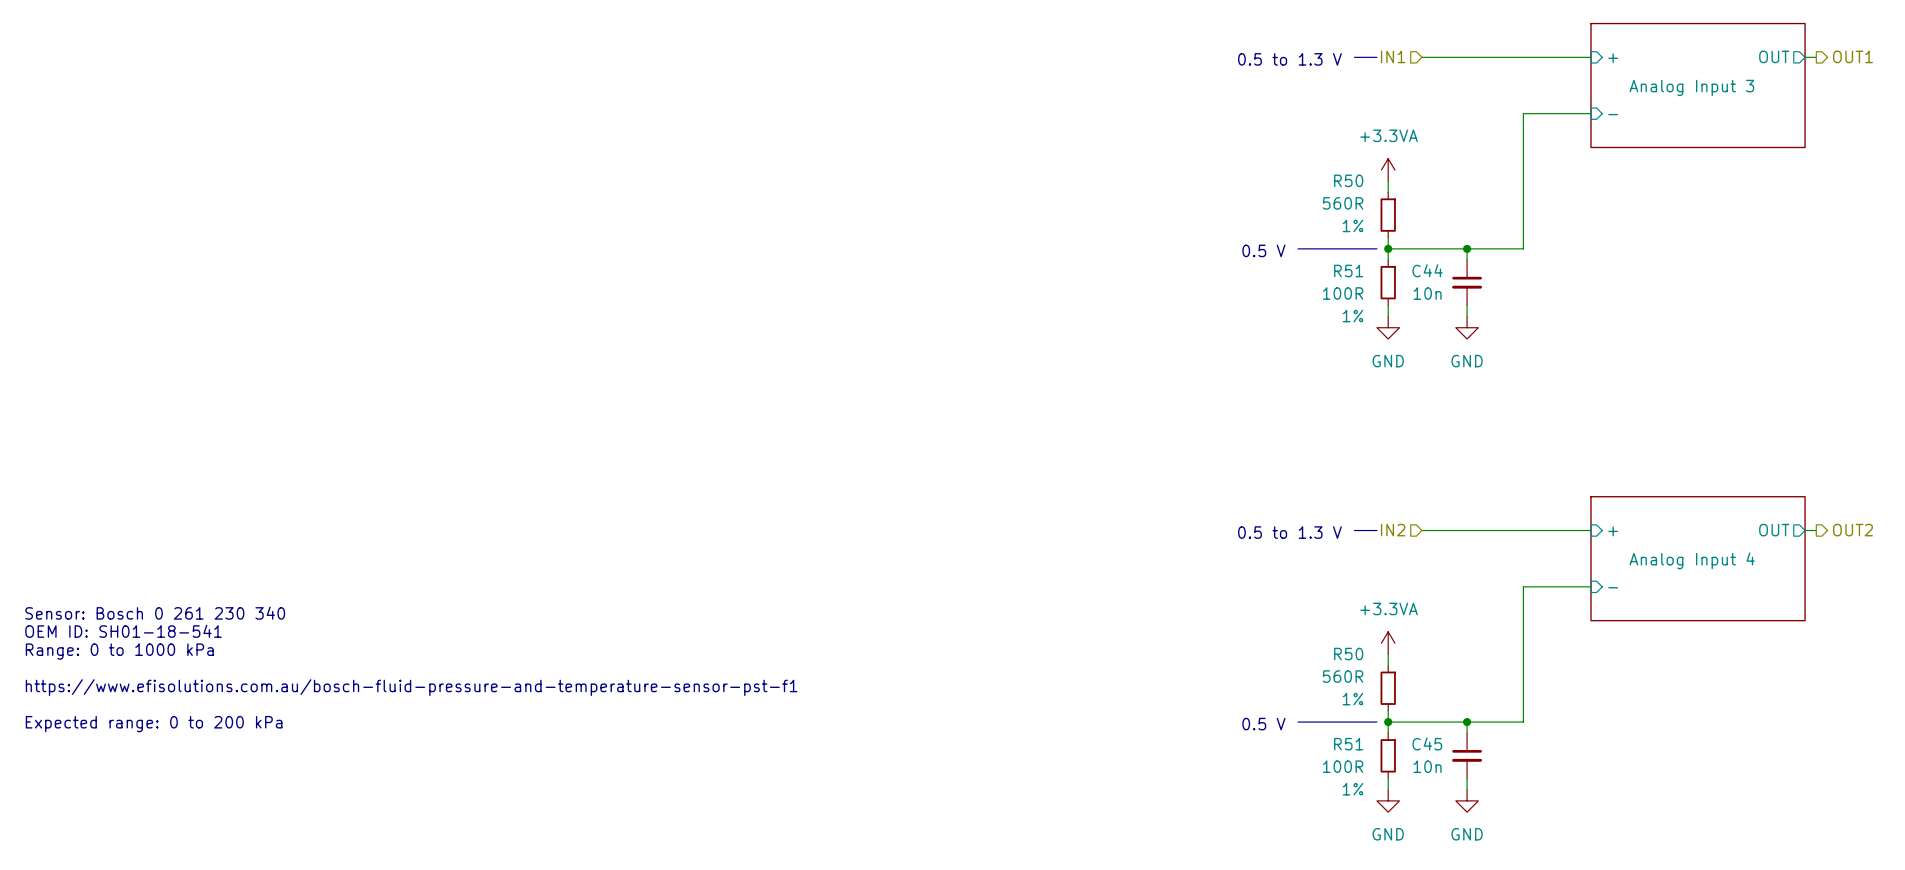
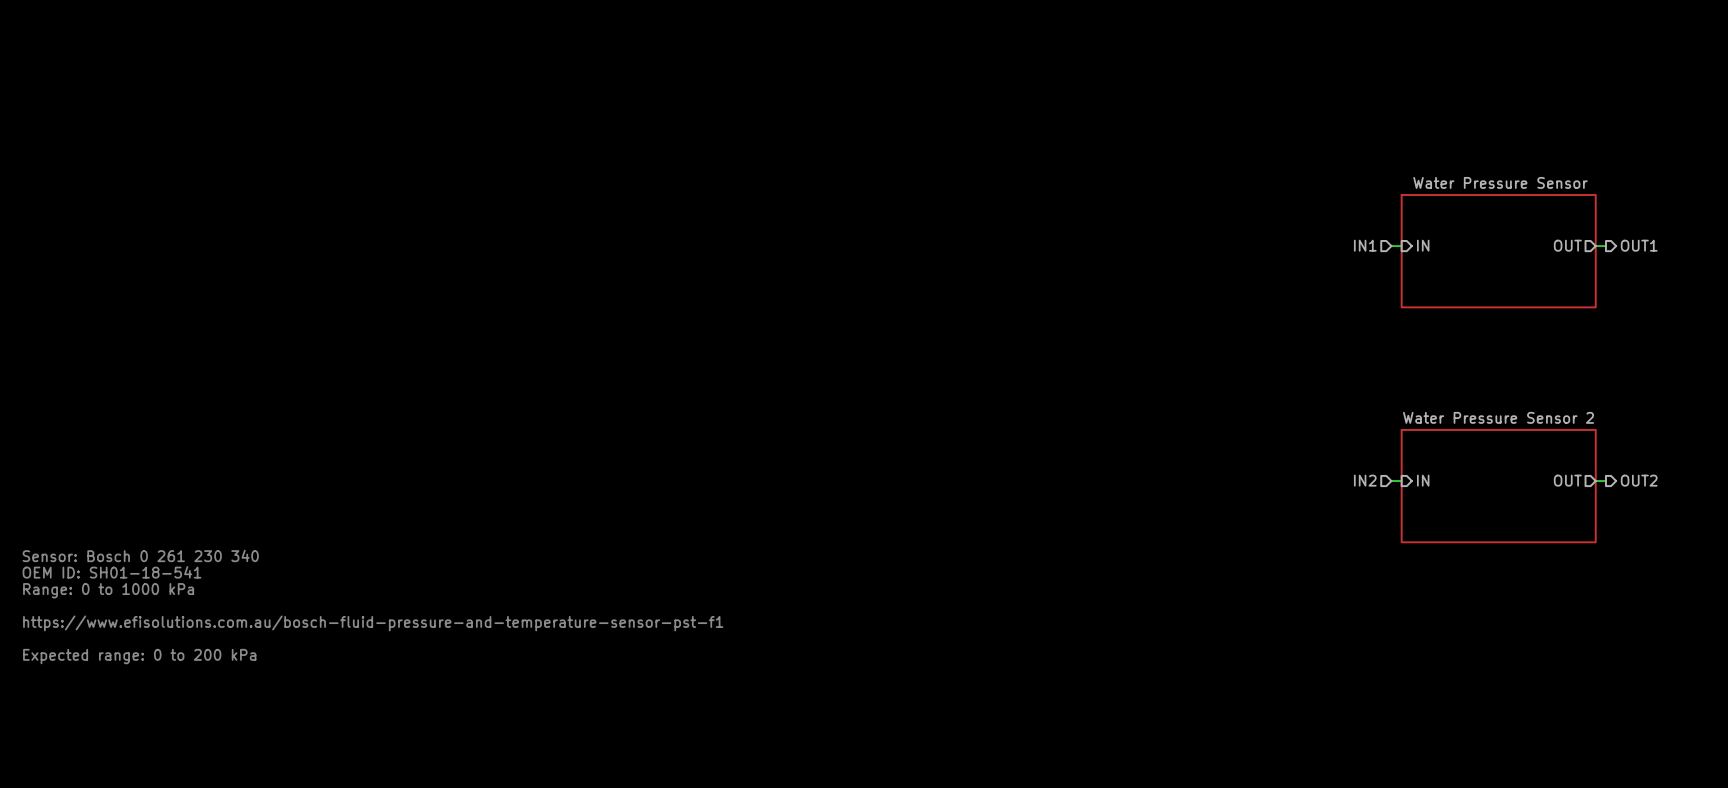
hierarchical label: IN1 (1393, 56) -> none
sheet pin: OUT (1774, 56) -> none
hierarchical label position: OUT1 (1852, 56) -> OUT1 (1639, 245)
line: (1354, 57) (1376, 57) -> none
wire: (1422, 57) (1590, 57) -> none
wire: (1805, 57) (1816, 57) -> (1595, 246) (1605, 246)
sheet pin: + (1613, 58) -> none
text: 0.5 to 1.3 V (1289, 59) -> none
sheet Analog Input 3: (1698, 85) -> none
wire: (1590, 113) (1523, 113) (1523, 248) (1388, 248) -> none
sheet pin: - (1613, 114) -> none
power symbol: +3.3VA (1388, 170) -> none
wire: (1388, 181) (1388, 192) -> none
R50: 560R (1388, 215) -> none
wire: (1388, 237) (1388, 260) -> none
line: (1298, 248) (1376, 248) -> none
junction: (1388, 248) -> none
wire: (1467, 248) (1467, 260) -> none
junction: (1467, 248) -> none
text: 0.5 V (1263, 250) -> none
hierarchical label: none -> IN1 (1365, 245)
sheet pin: none -> IN (1423, 245)
sheet pin: none -> OUT (1567, 245)
wire: none -> (1391, 246) (1401, 246)
sheet Water Pressure Sensor: none -> (1498, 251)
R51: 100R (1388, 282) -> none
C44: 10n (1467, 282) -> none
wire: (1388, 305) (1388, 316) -> none
wire: (1467, 305) (1467, 316) -> none
power symbol: GND (1388, 327) -> none
power symbol: GND (1467, 327) -> none
line: (1354, 530) (1376, 530) -> none
hierarchical label position: IN2 (1393, 530) -> IN2 (1365, 480)
wire: (1422, 530) (1534, 530) -> none
wire: (1545, 530) (1590, 530) -> none
sheet pin: none -> IN (1423, 480)
sheet pin position: OUT (1774, 530) -> OUT (1567, 480)
wire: (1805, 530) (1816, 530) -> (1595, 481) (1605, 481)
hierarchical label position: OUT2 (1852, 530) -> OUT2 (1639, 480)
sheet pin: + (1613, 531) -> none
text: 0.5 to 1.3 V (1289, 532) -> none
sheet Water Pressure Sensor 2: none -> (1498, 486)
sheet Analog Input 4: (1698, 558) -> none
wire: (1590, 586) (1523, 586) (1523, 722) (1388, 722) -> none
sheet pin: - (1613, 587) -> none
power symbol: +3.3VA (1388, 643) -> none
wire: (1388, 654) (1388, 665) -> none
R50: 560R (1388, 688) -> none
wire: (1388, 710) (1388, 733) -> none
line: (1298, 722) (1376, 722) -> none
junction: (1388, 722) -> none
wire: (1467, 722) (1467, 733) -> none
junction: (1467, 722) -> none
text: 0.5 V (1263, 724) -> none
R51: 100R (1388, 755) -> none
C45: 10n (1467, 755) -> none
wire: (1388, 778) (1388, 789) -> none
wire: (1467, 778) (1467, 789) -> none
power symbol: GND (1388, 800) -> none
power symbol: GND (1467, 800) -> none

